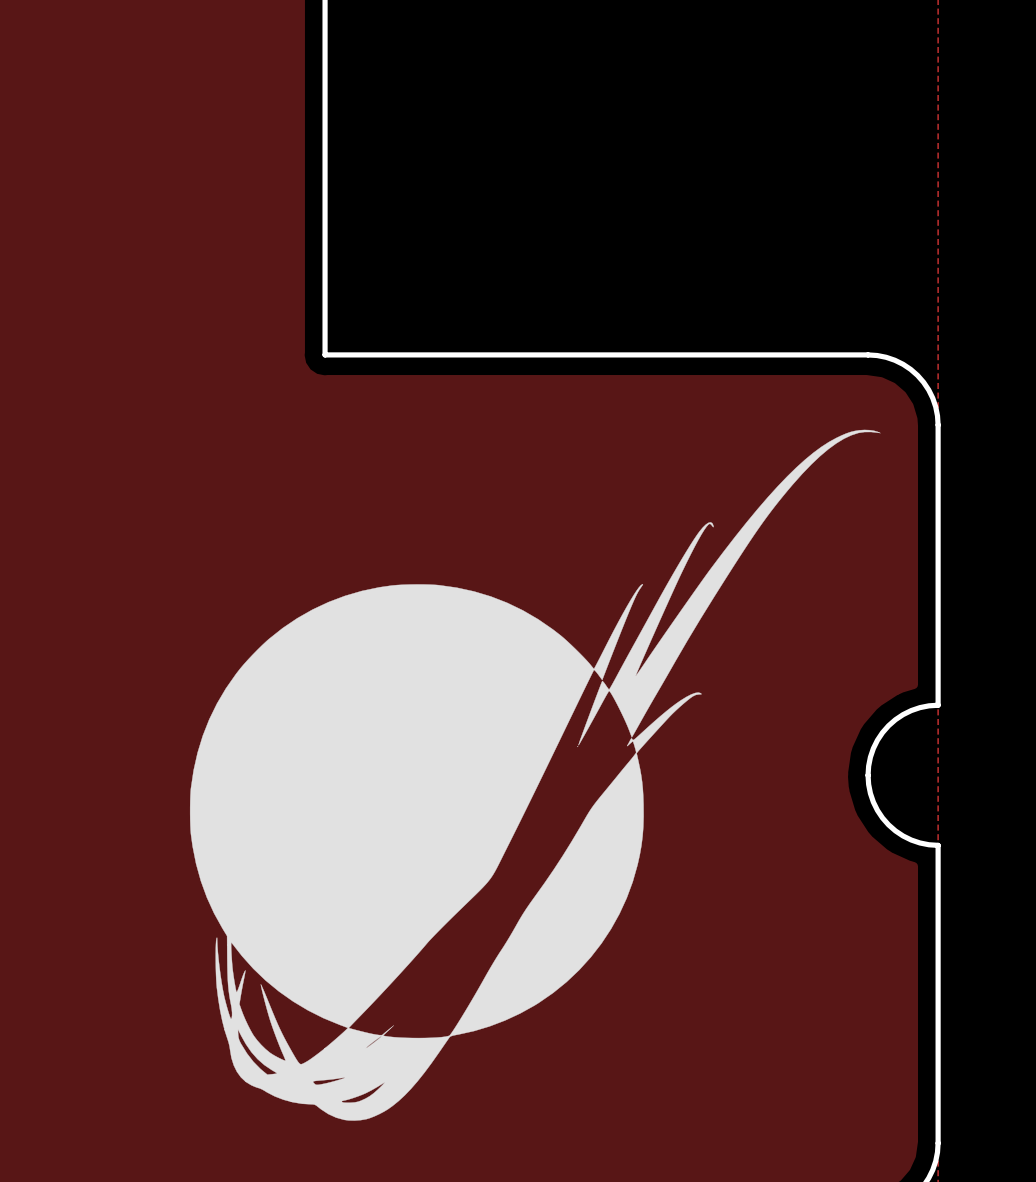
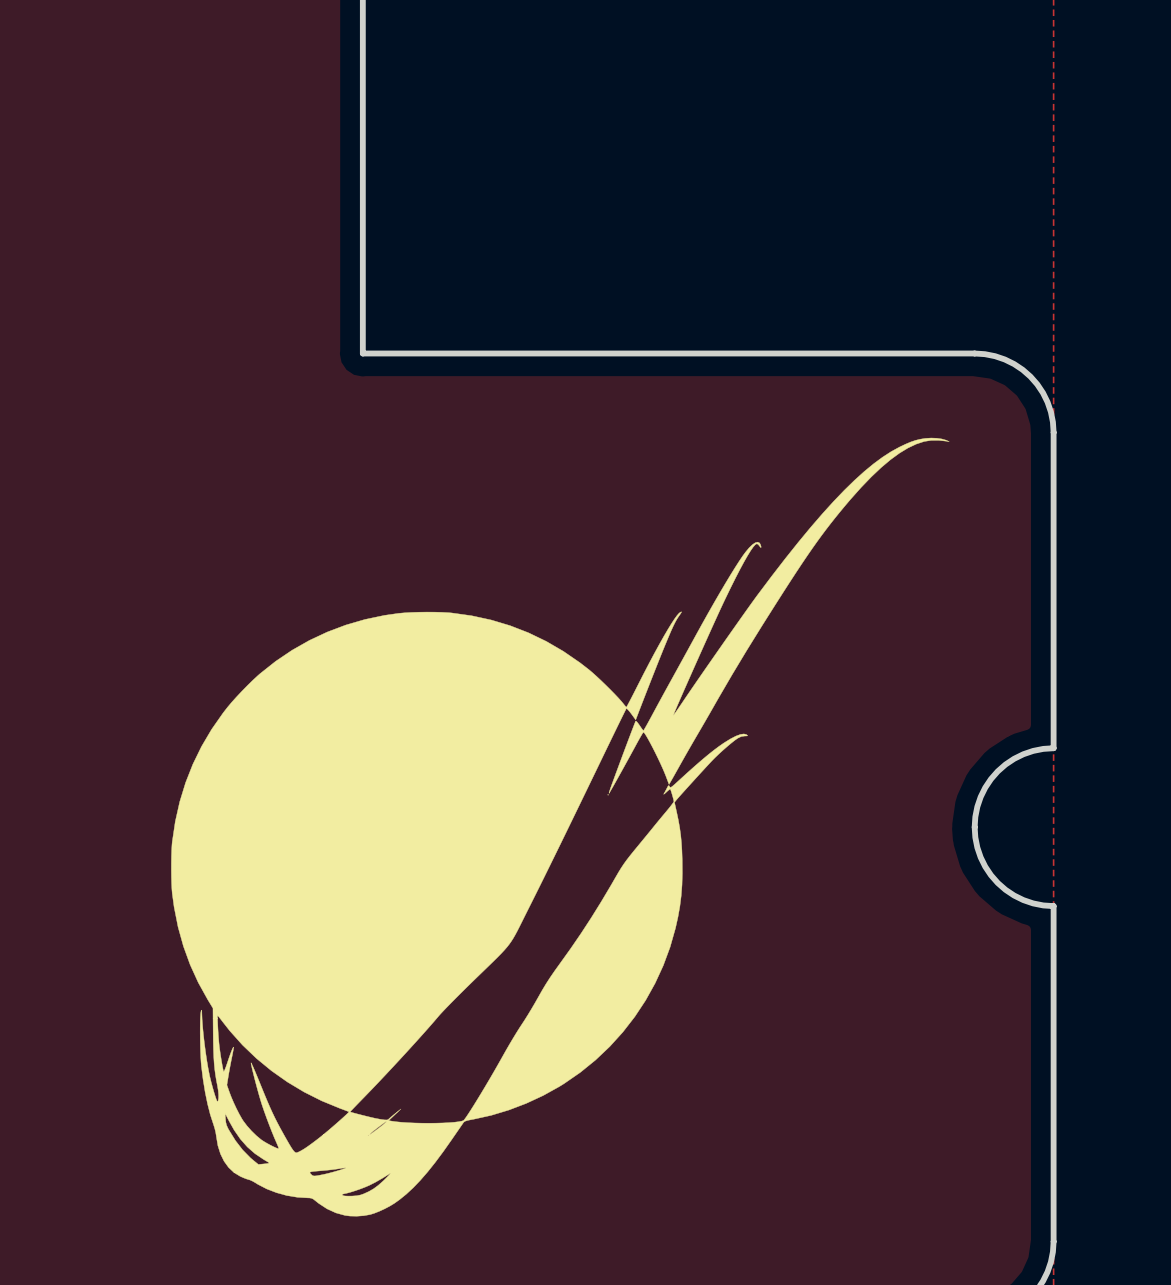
drawing position: (535, 775) -> (560, 827)

